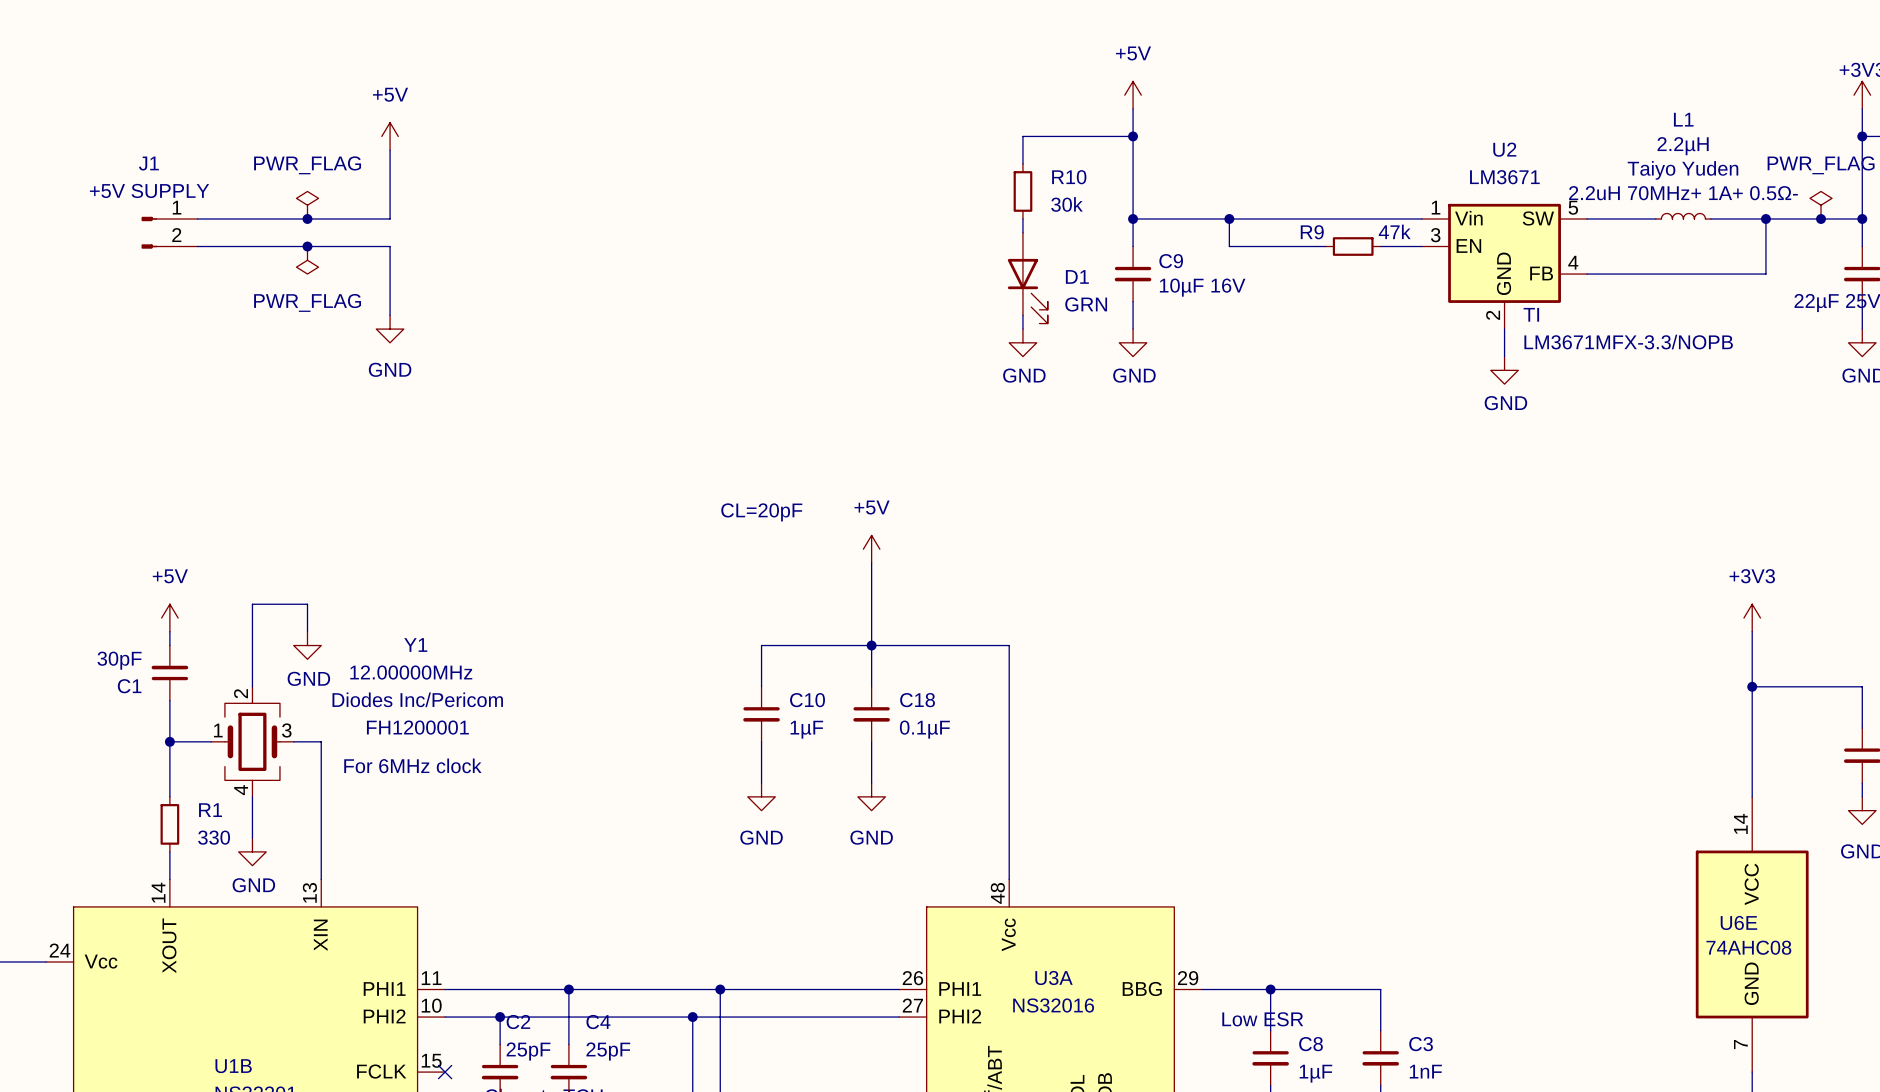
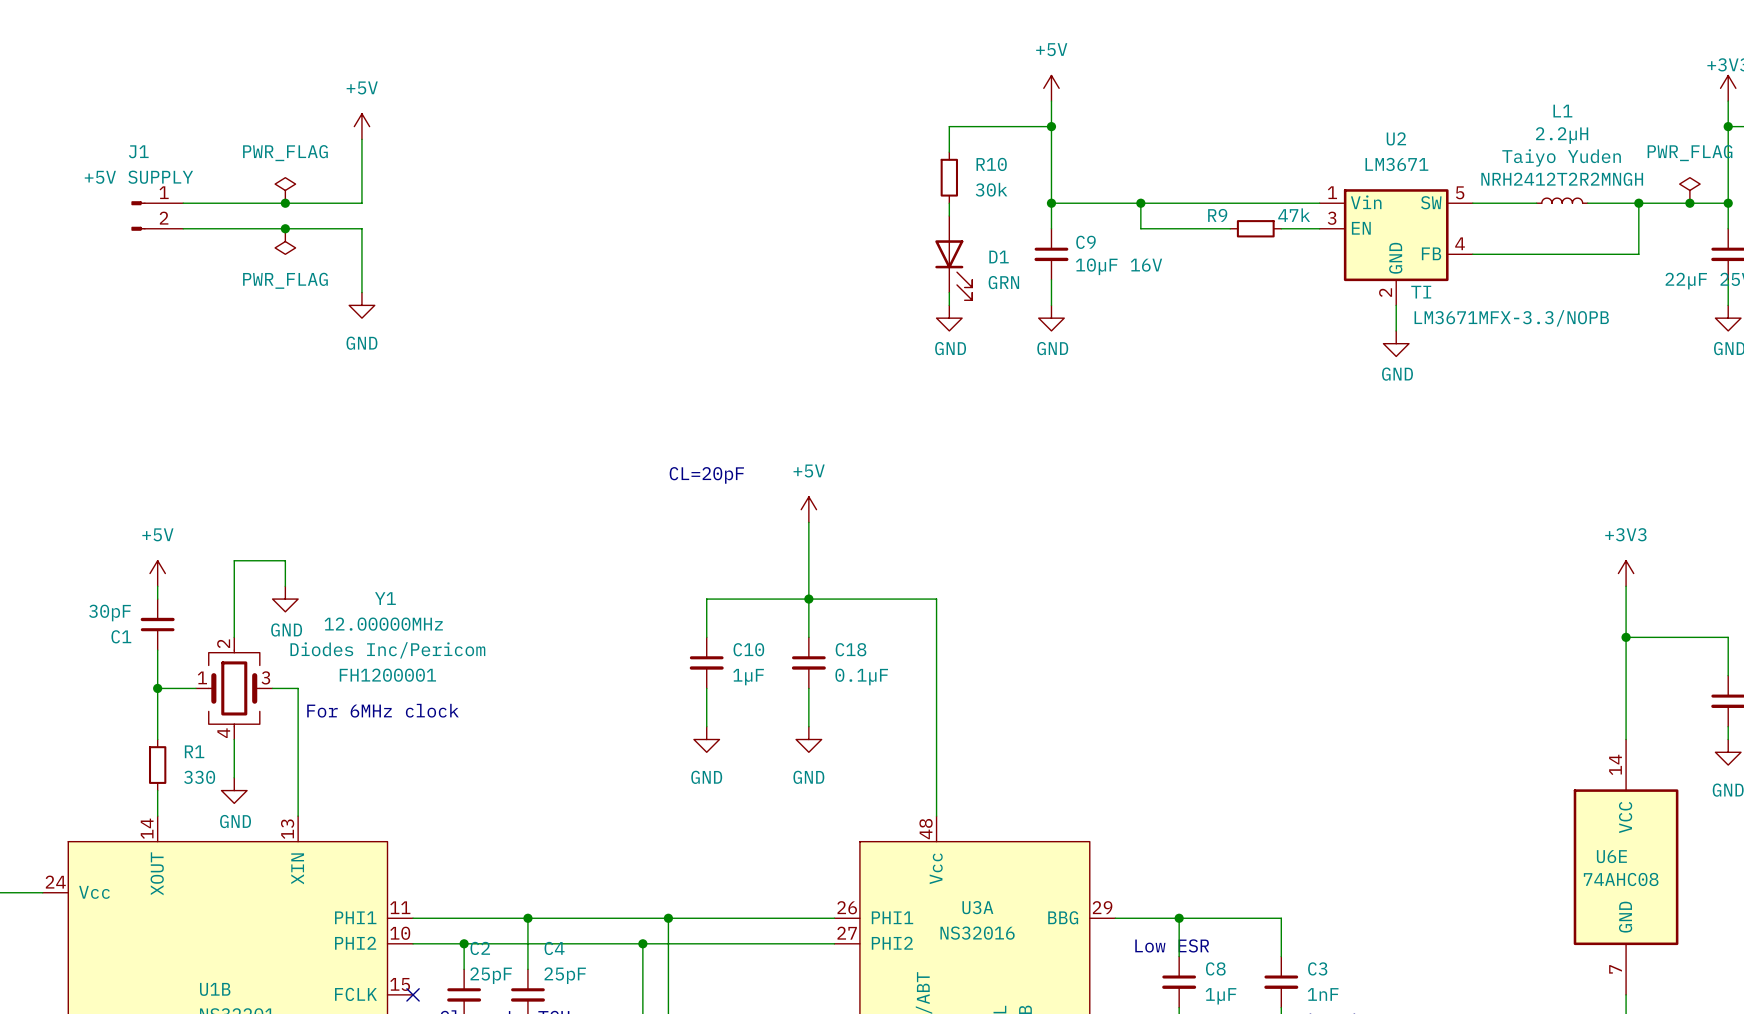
L1 text: 2.2uH 70MHz+ 1A+ 0.5Ω- (1683, 193) -> NRH2412T2R2MNGH (1562, 179)

